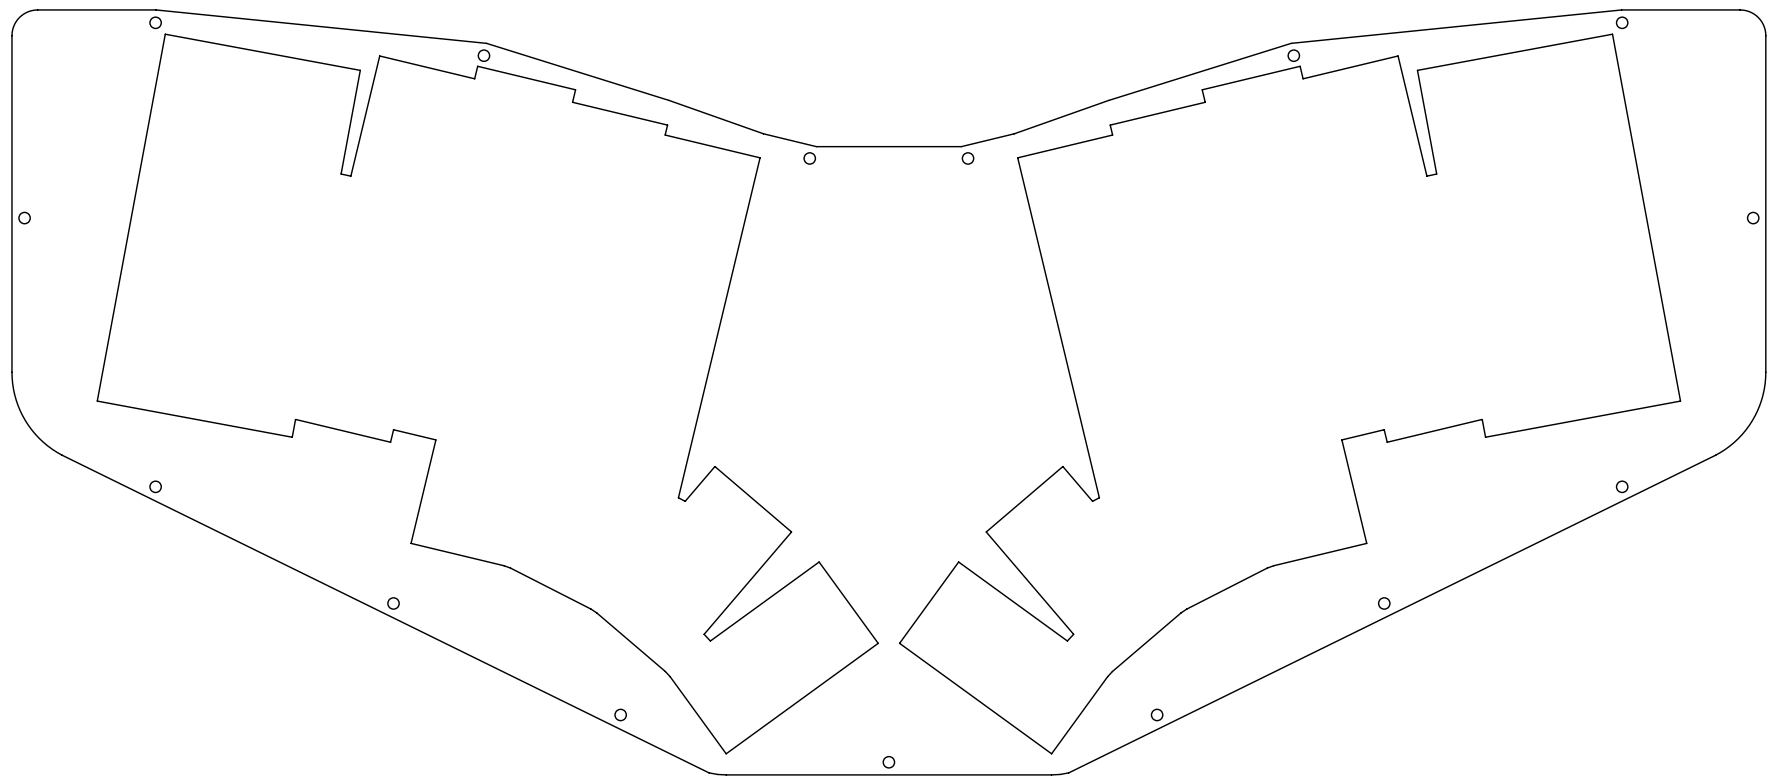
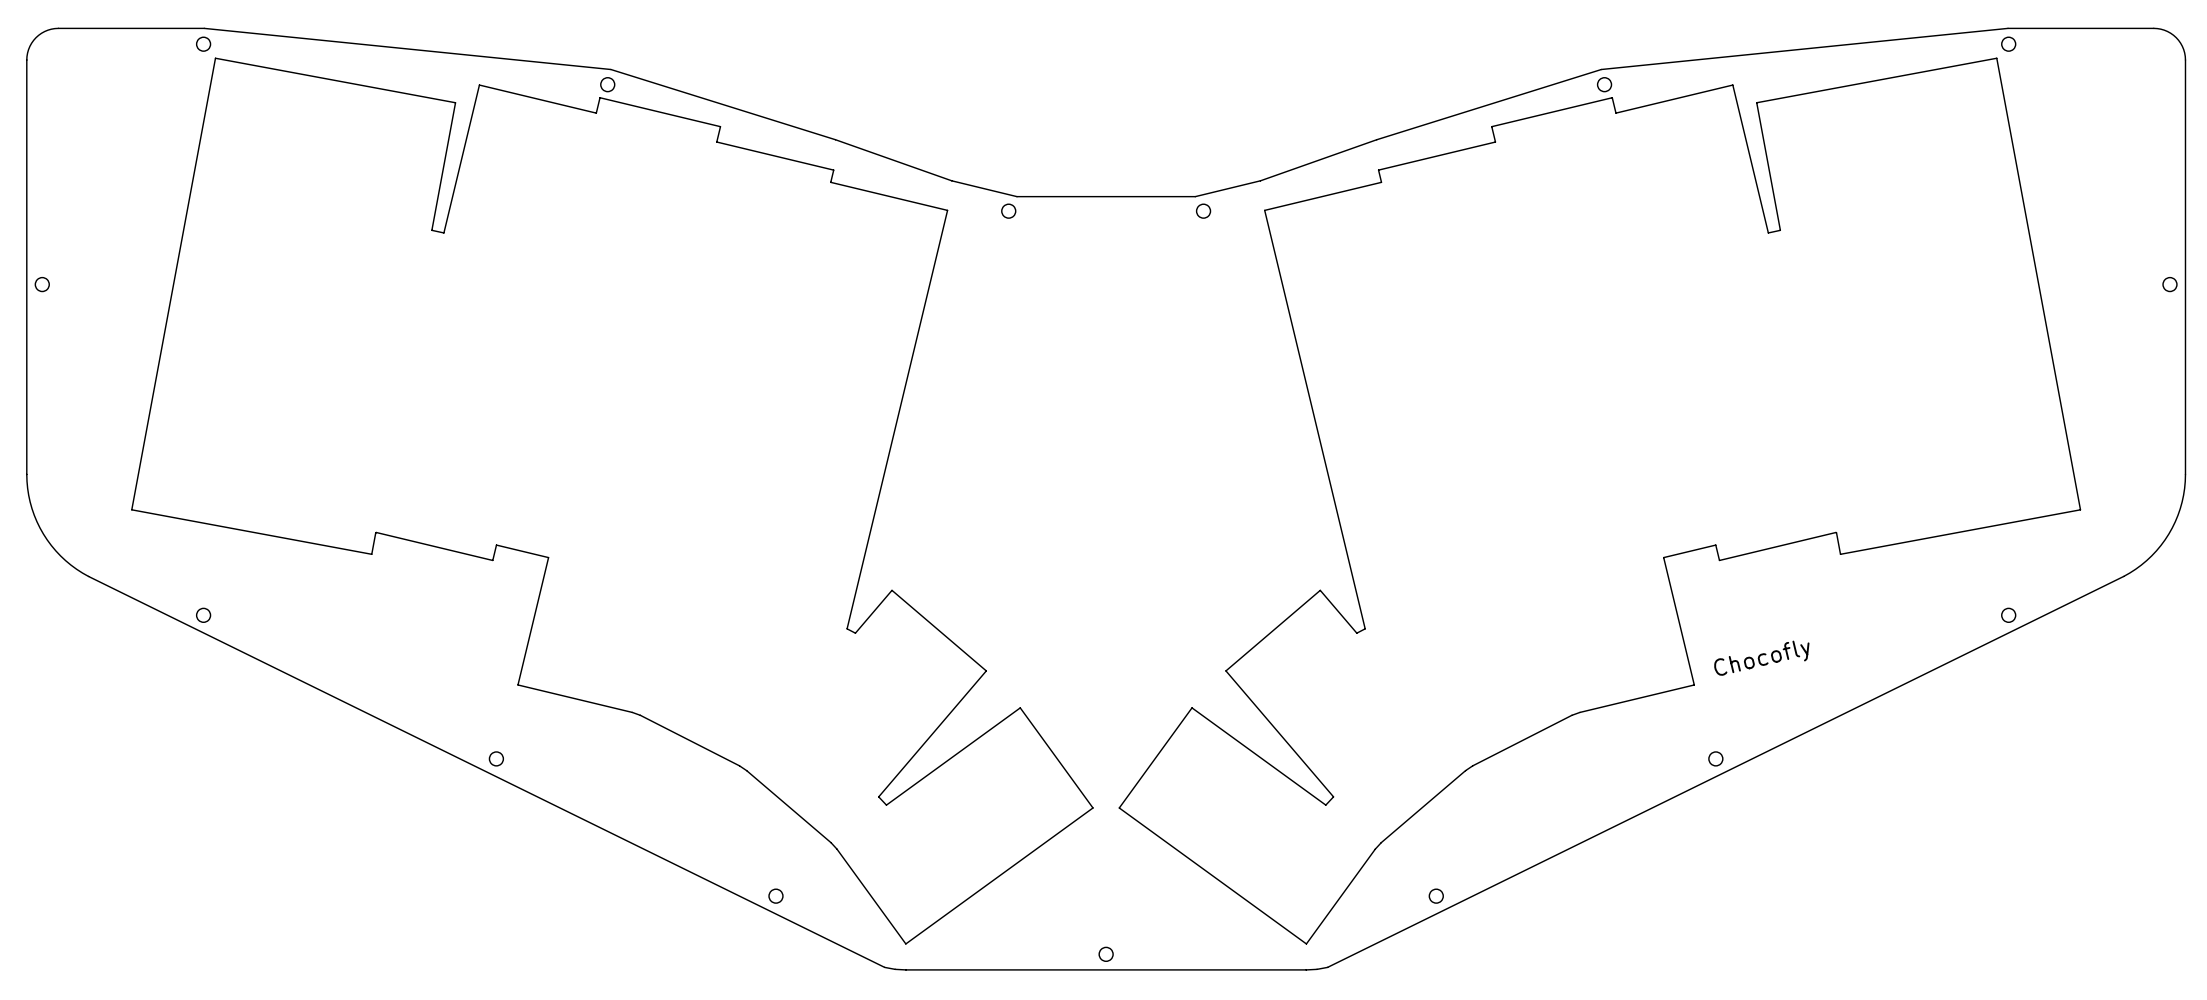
text: none -> Chocofly (1761, 658)

